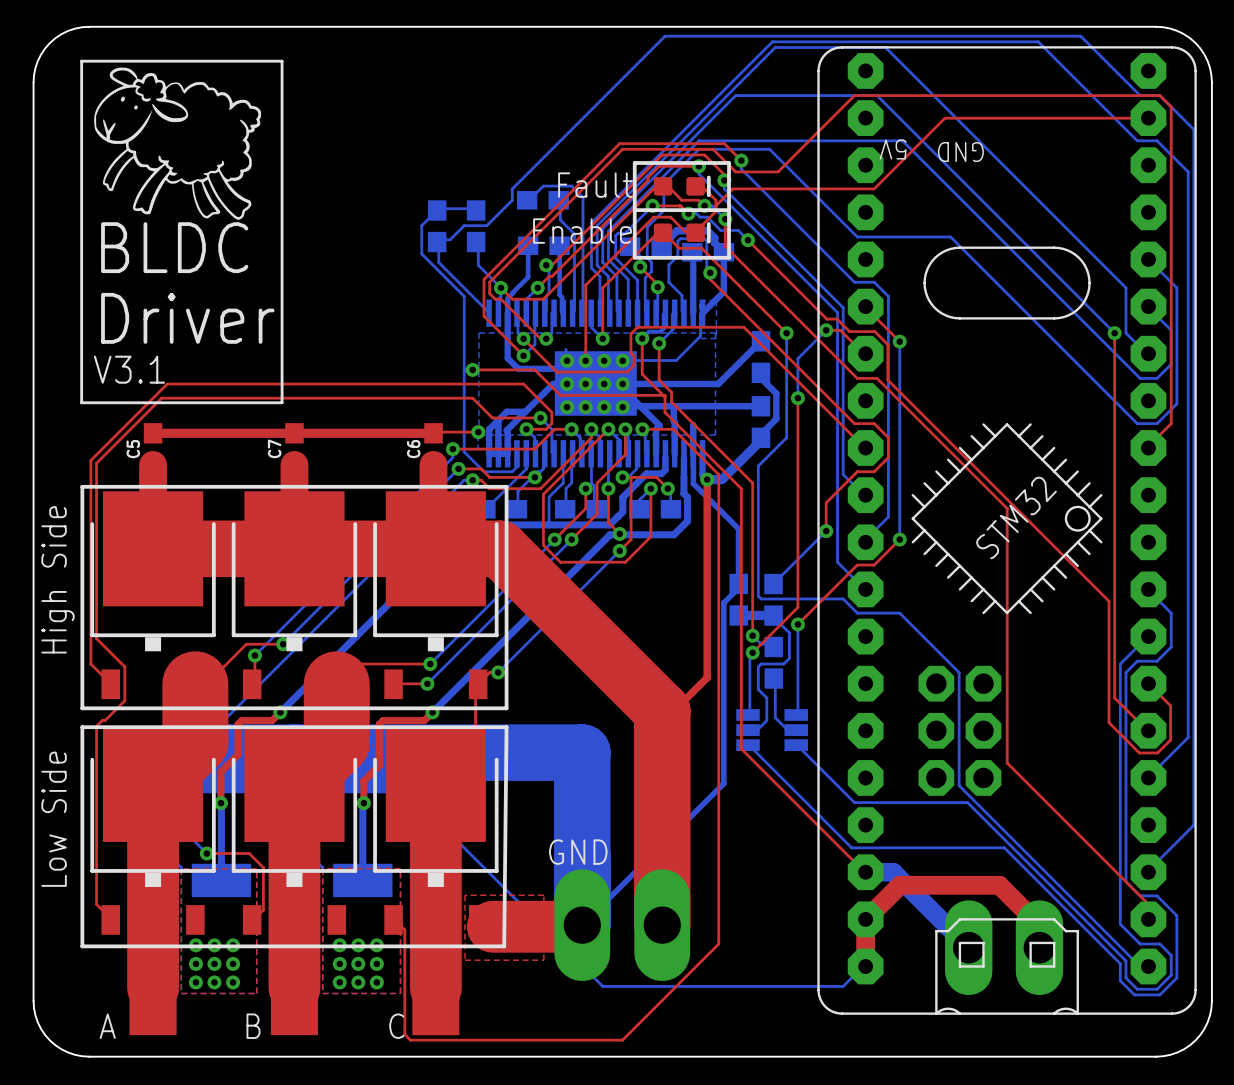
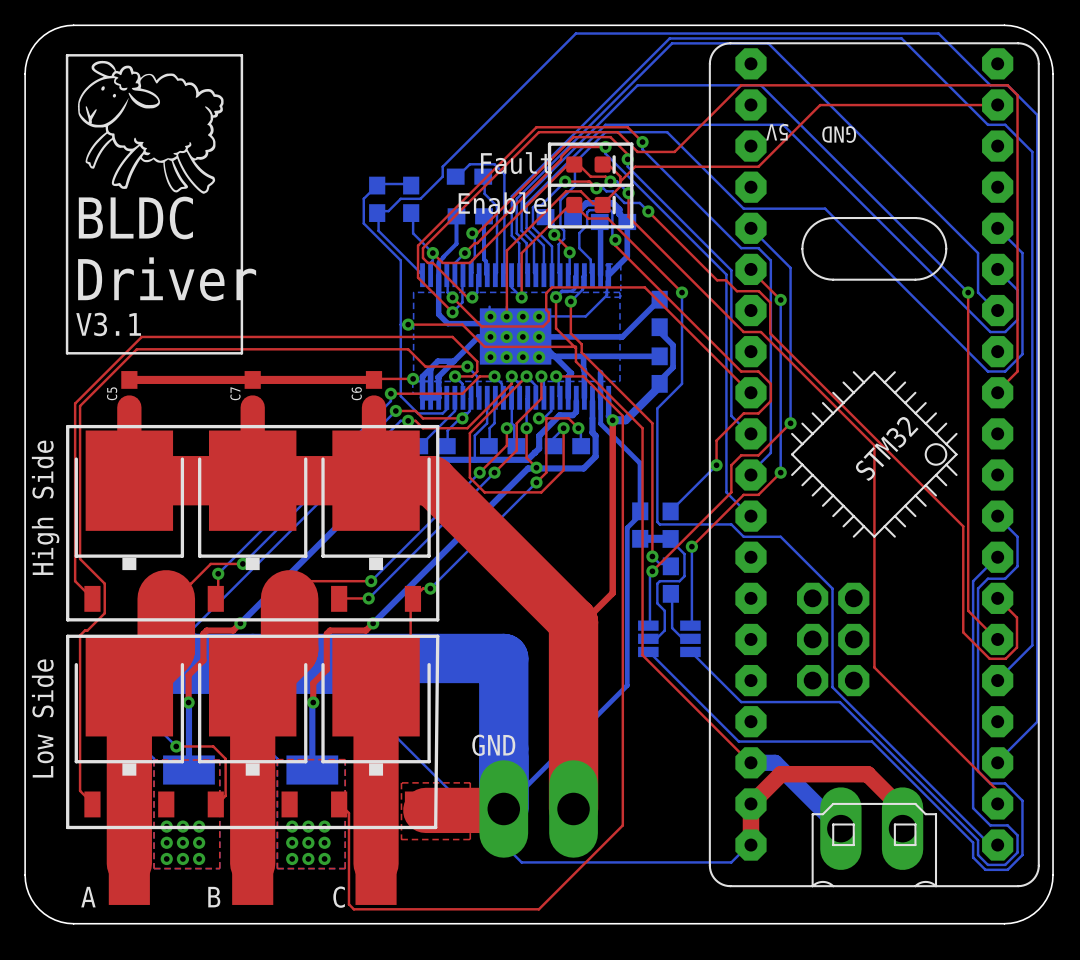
bottom track: none -> (751, 228) (790, 267) (790, 423)
bottom track: (826, 330) (797, 358) (797, 398) -> none
top track: (826, 330) (840, 330) (865, 353) -> none
via: (826, 330) -> none
top track: (797, 398) (797, 607) -> (790, 423) (758, 455) (741, 455) (731, 465) (731, 492) (691, 531)
via: (797, 398) -> none
via: none -> (790, 423)

